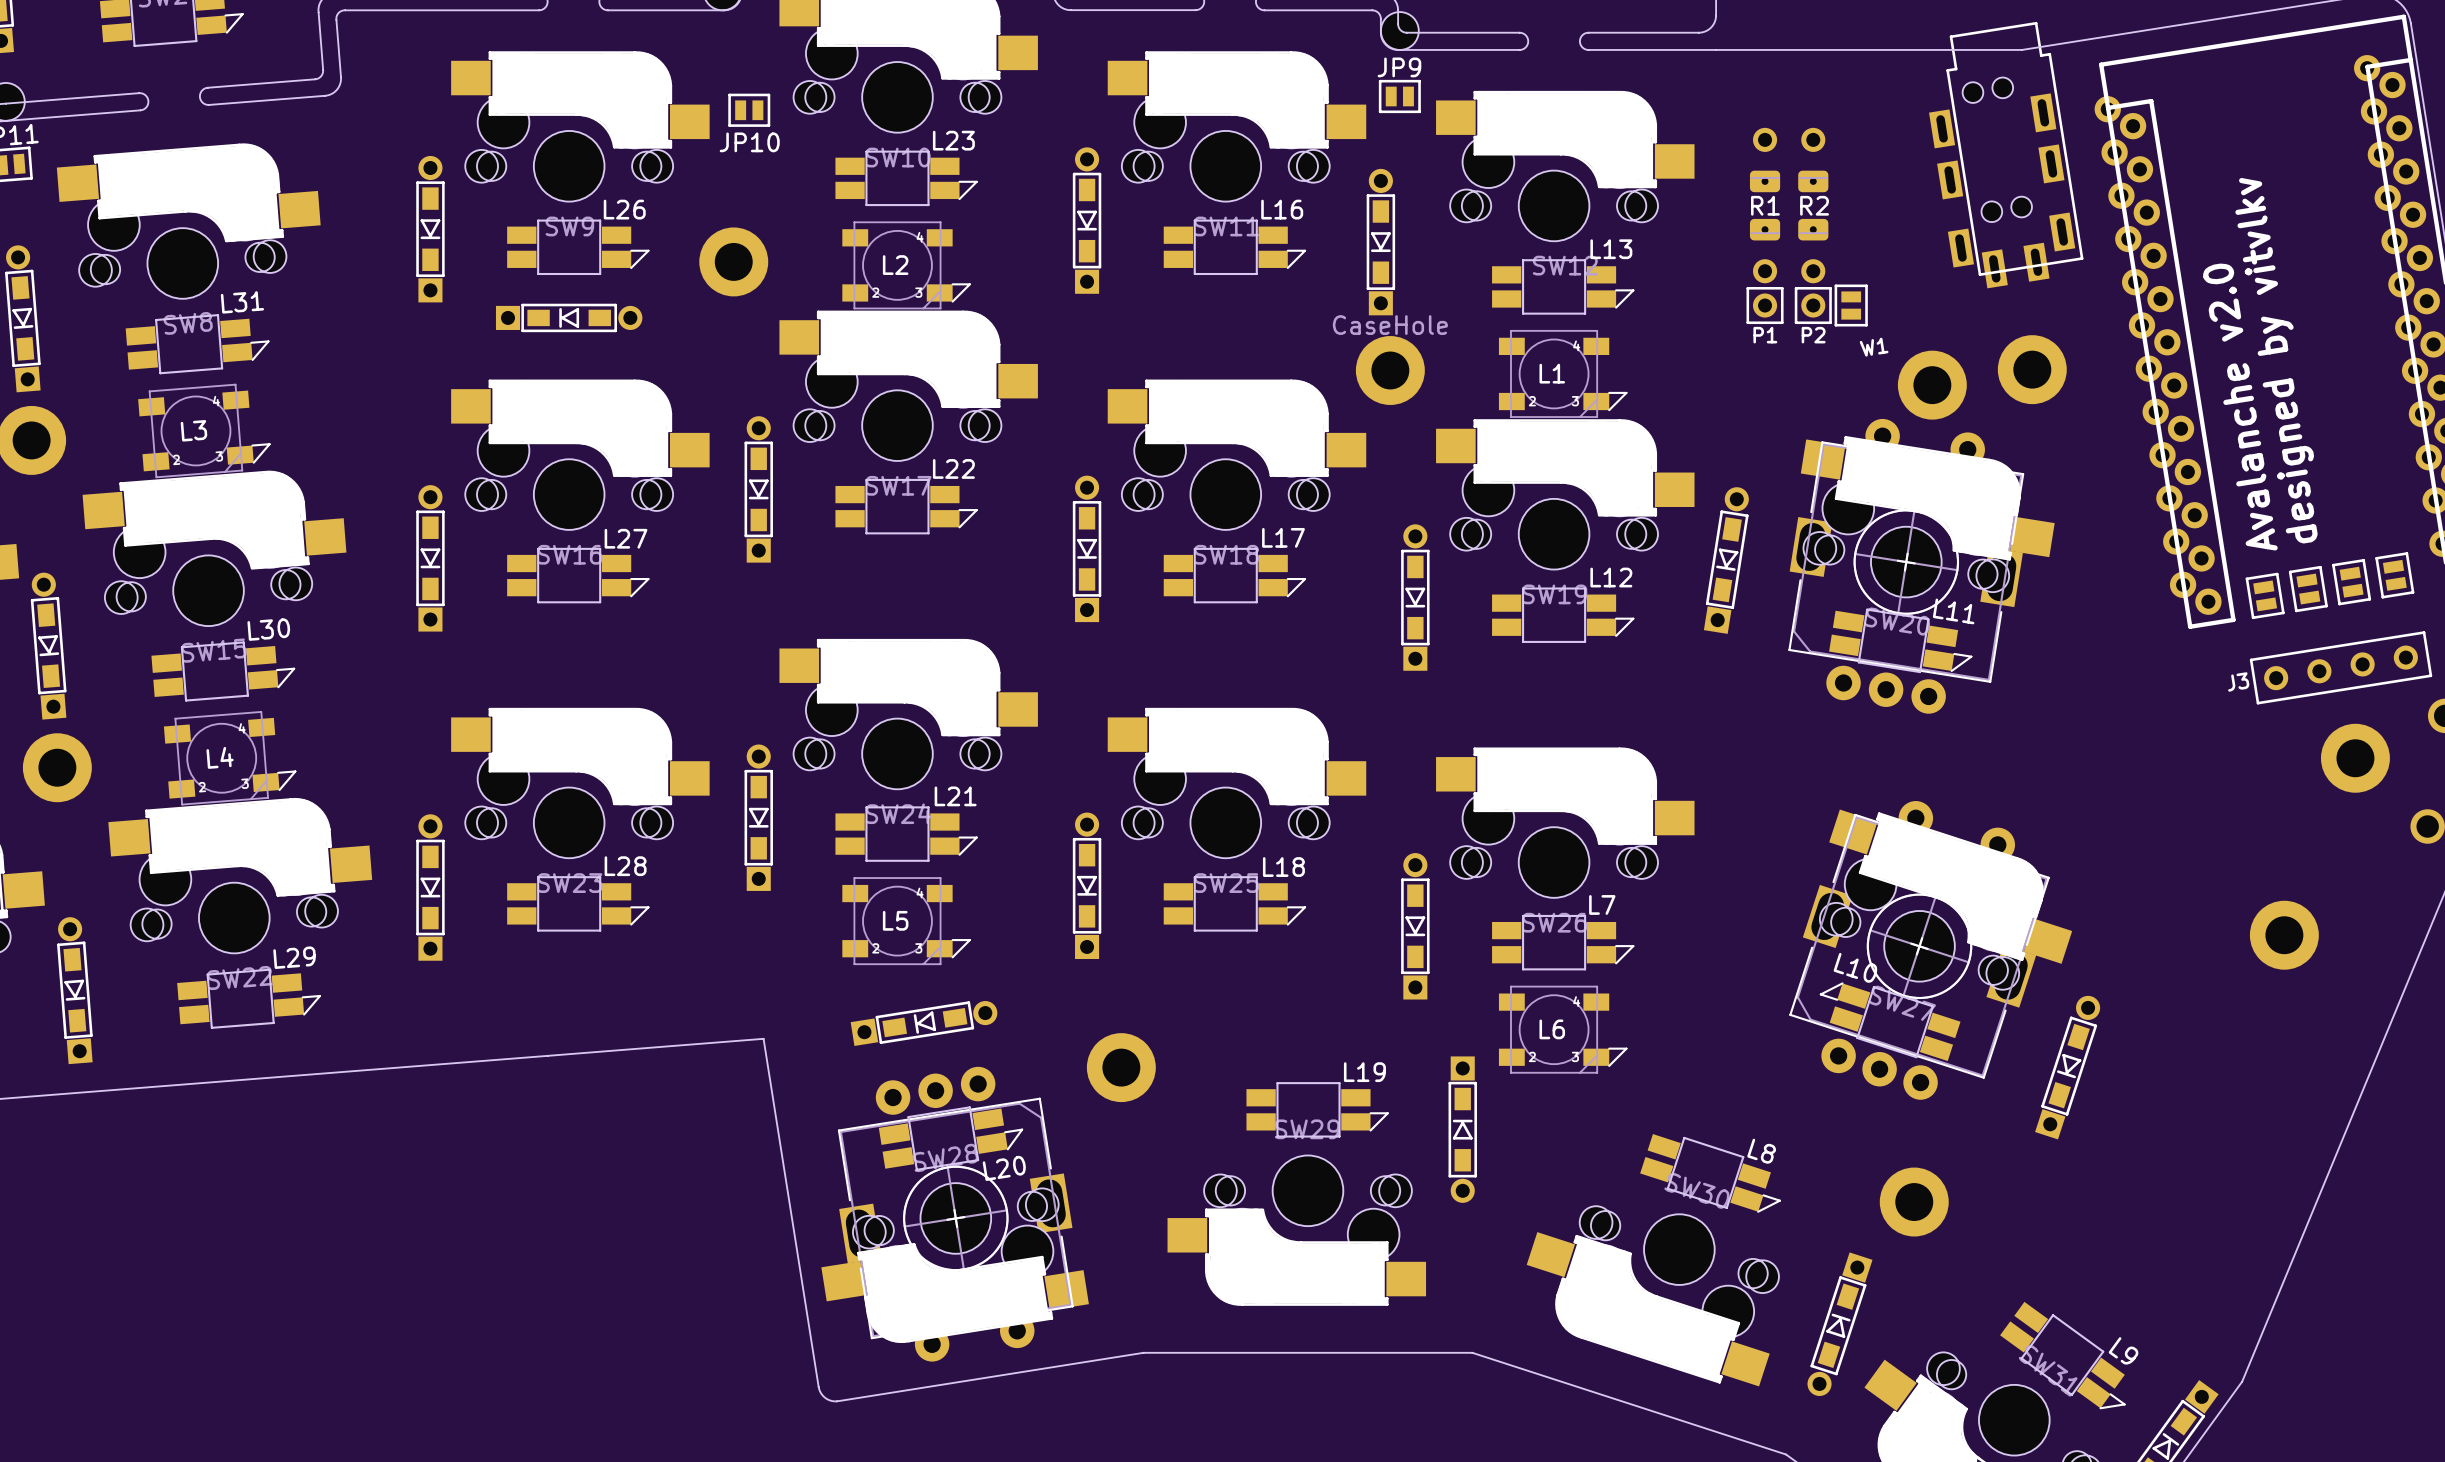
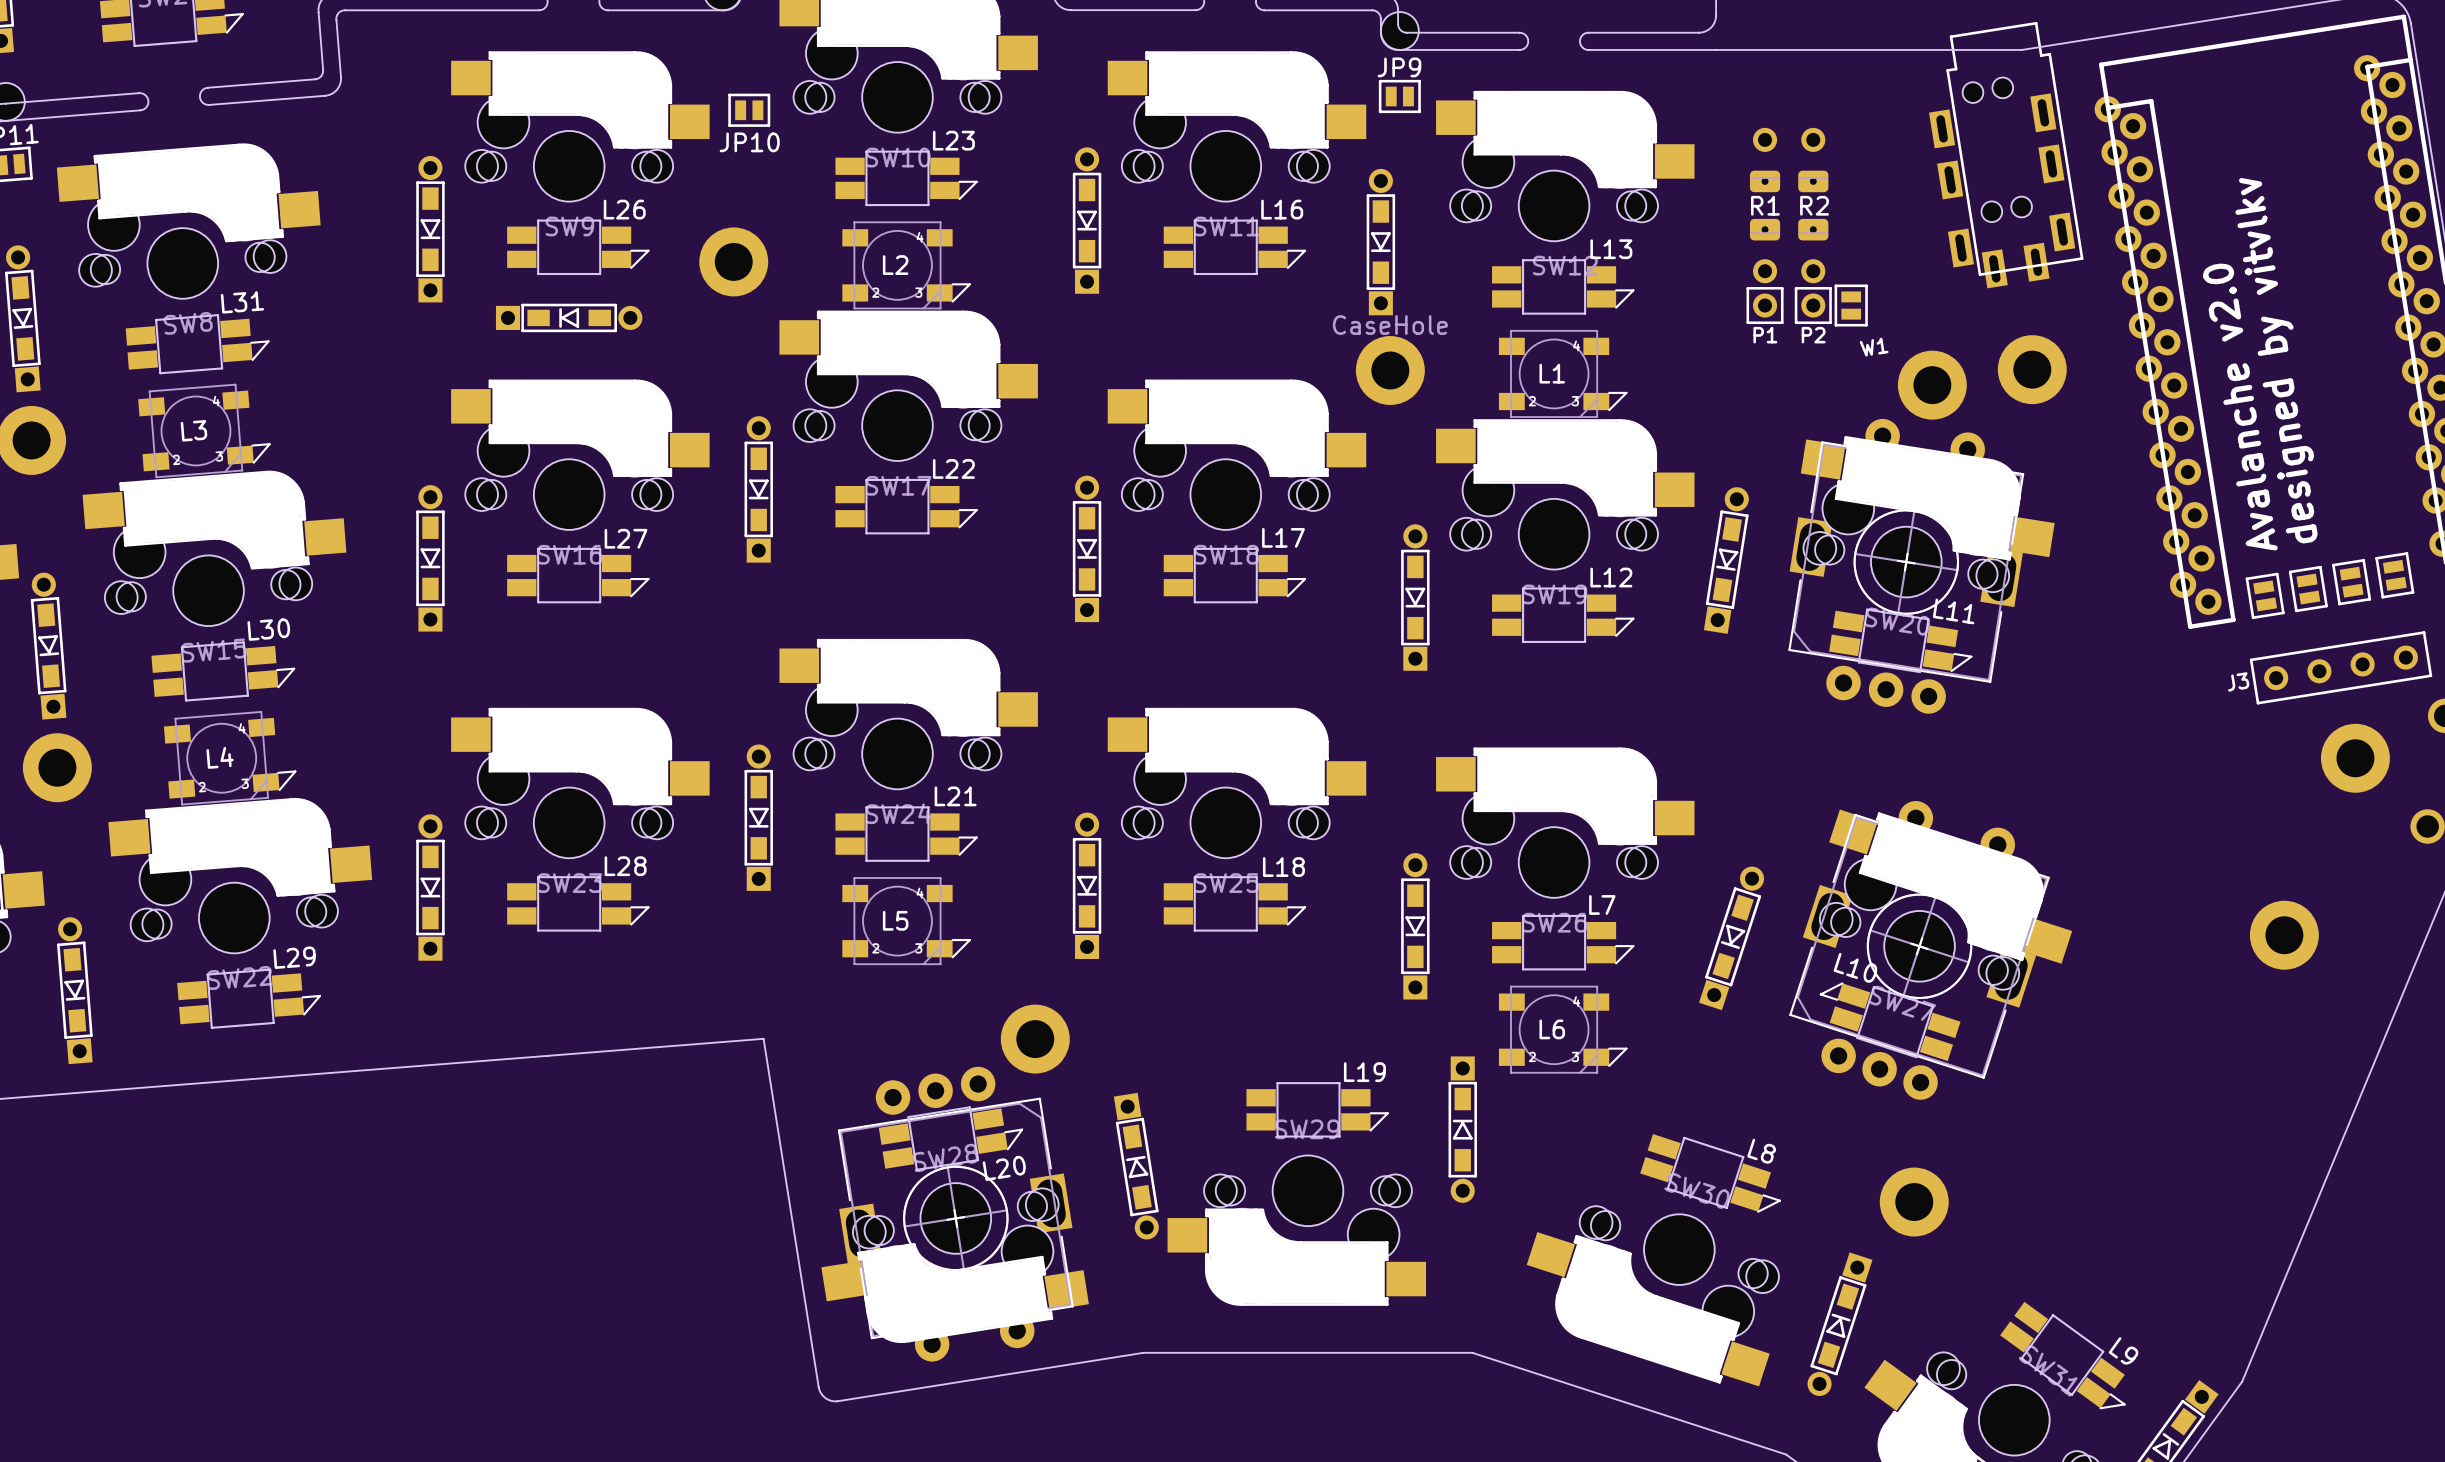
part rotation: 0° (924, 1023) -> 90° clockwise (1136, 1166)
part position: (924, 1023) -> (1136, 1166)
part position: (1121, 1067) -> (1035, 1039)
part position: (2067, 1067) -> (1731, 938)

